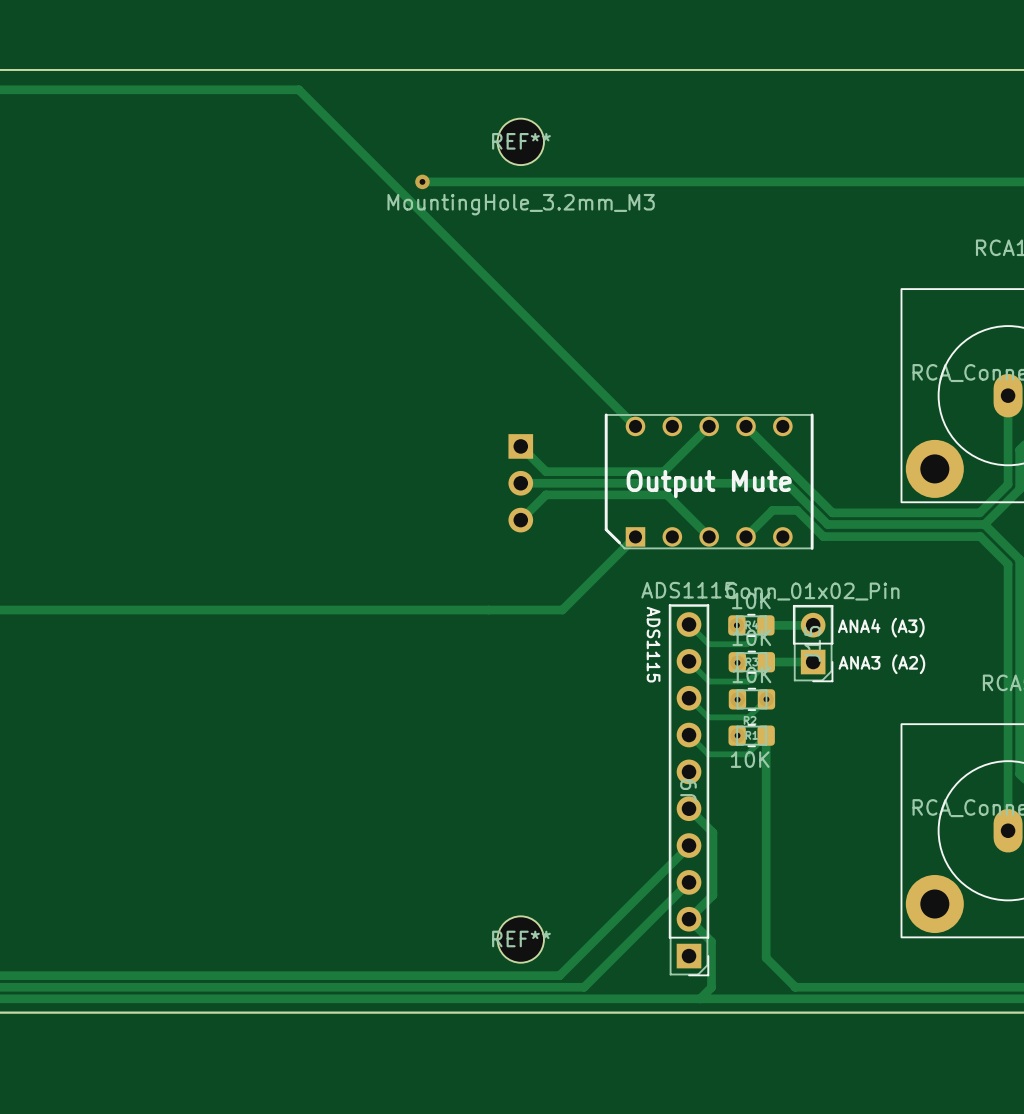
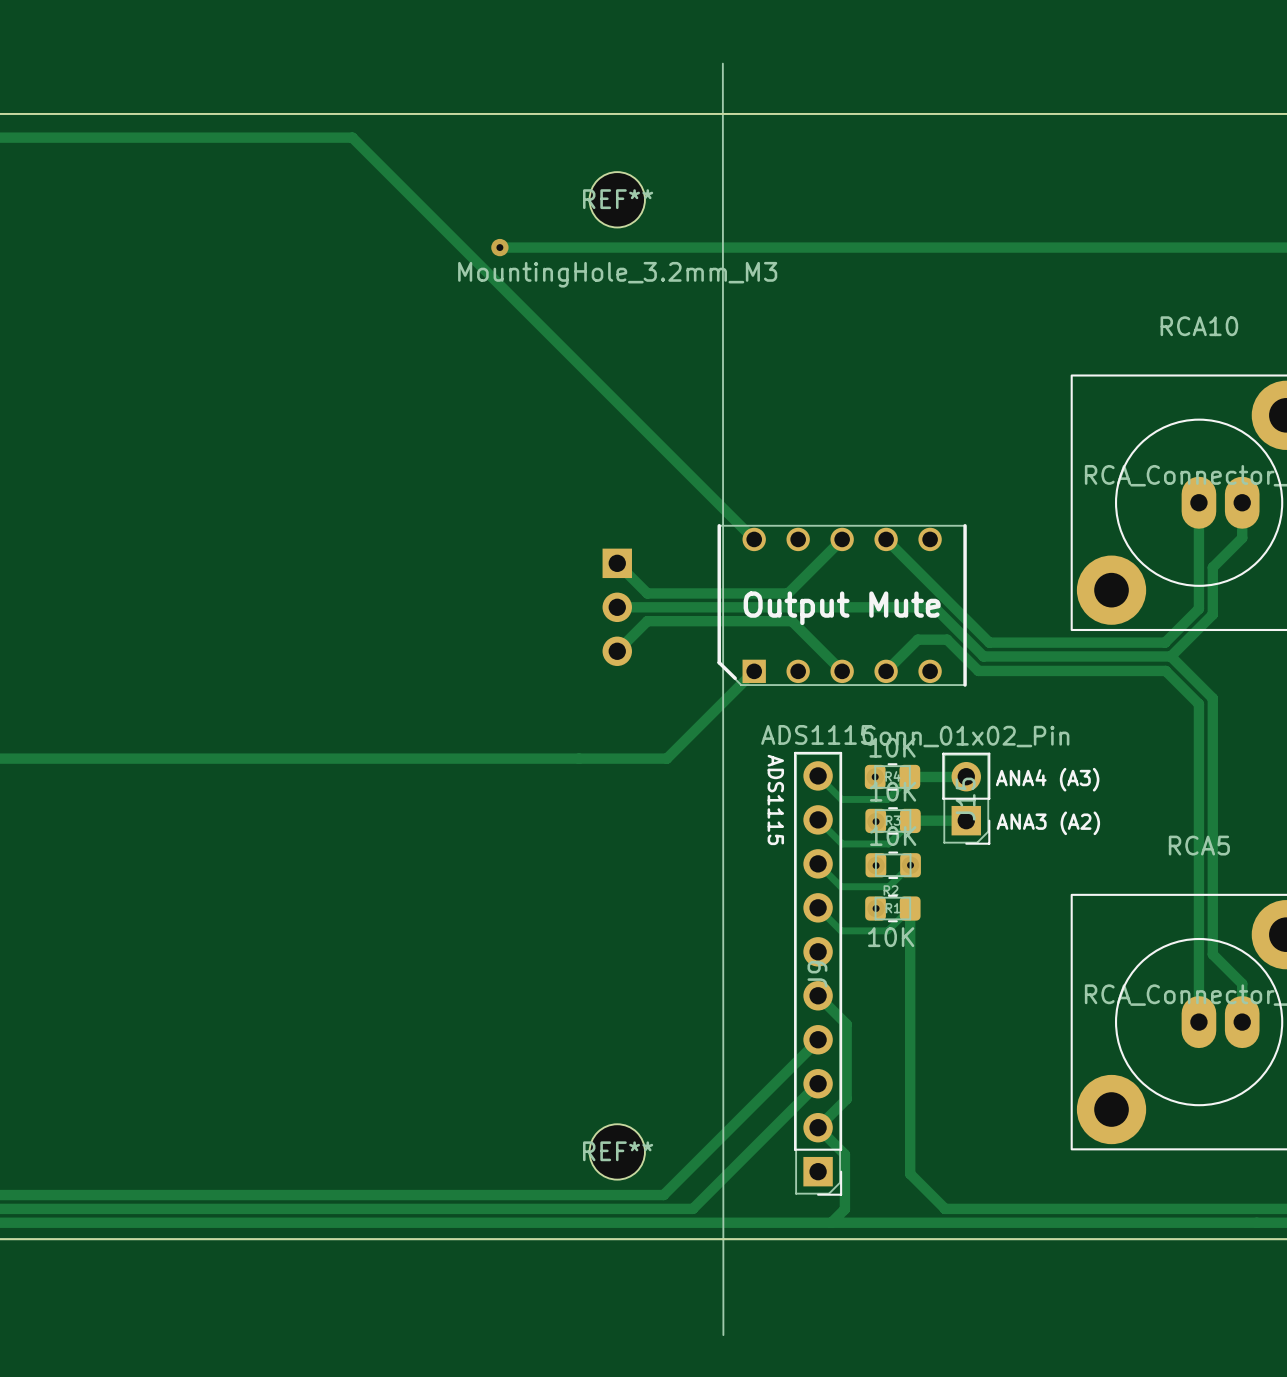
line: none -> (722, 63) (723, 1335)

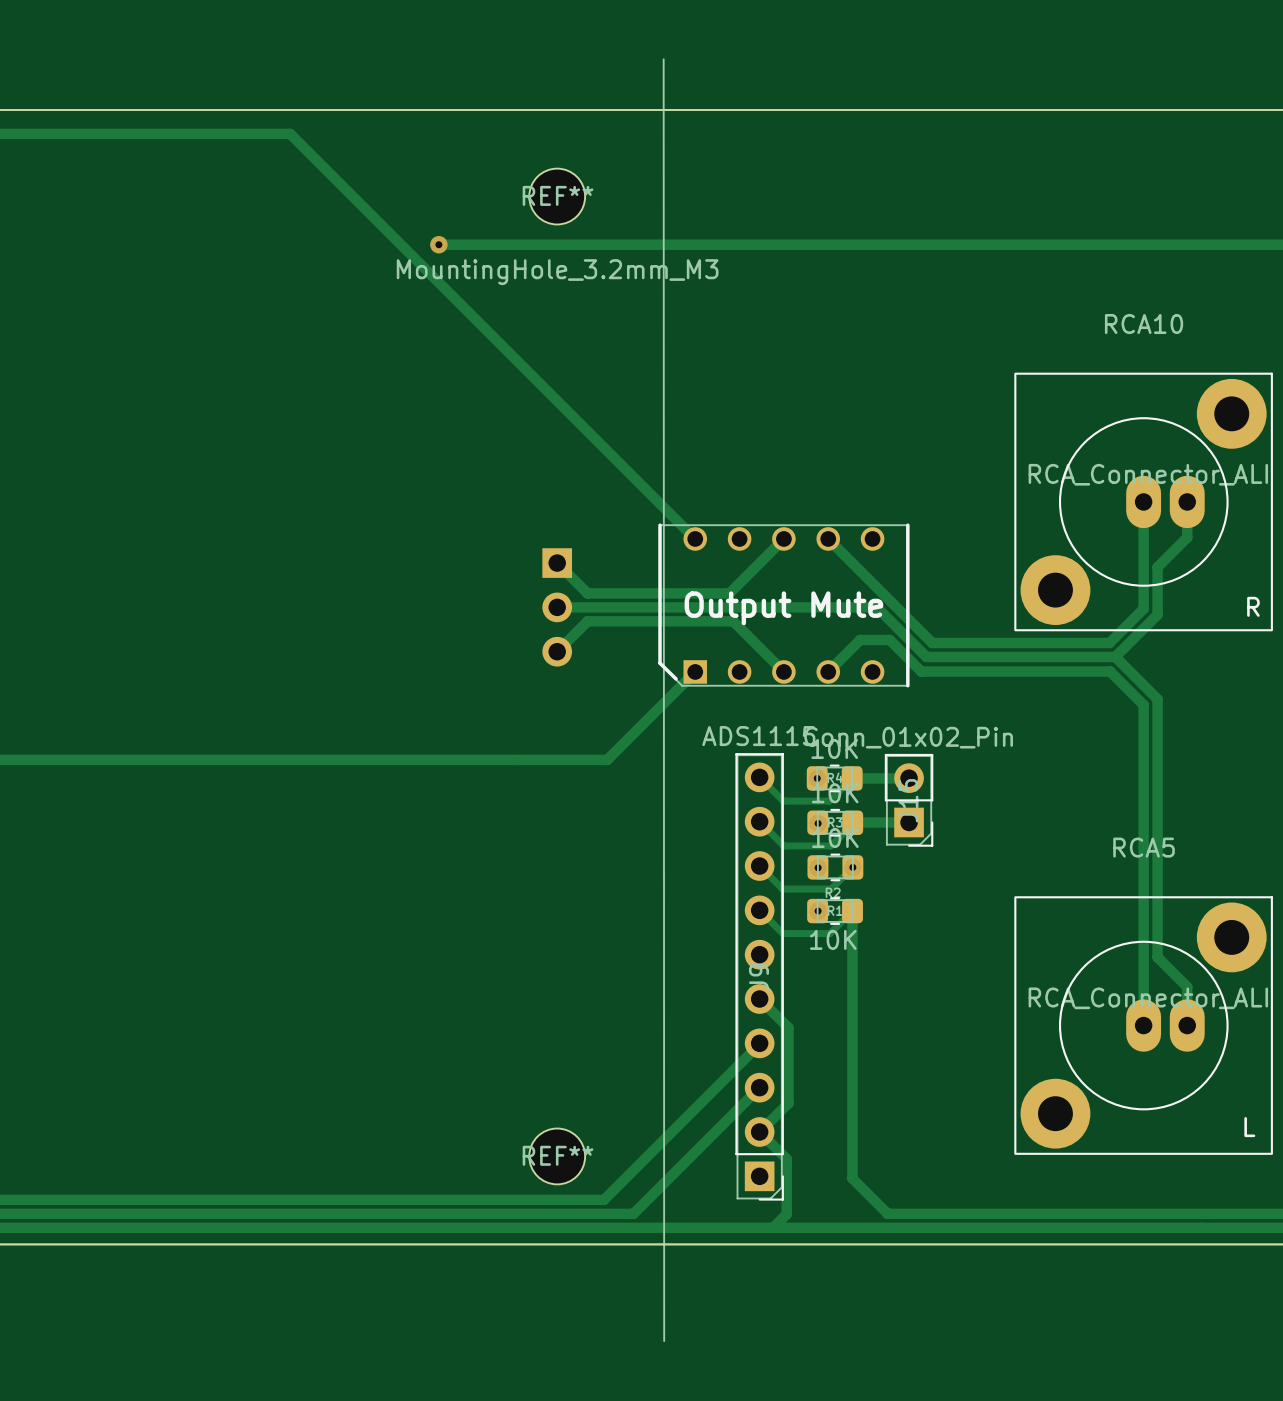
text: ANA4 (A3) (1047, 779) -> none
text: ADS1115 (775, 799) -> none
text: ANA3 (A2) (1048, 823) -> none

